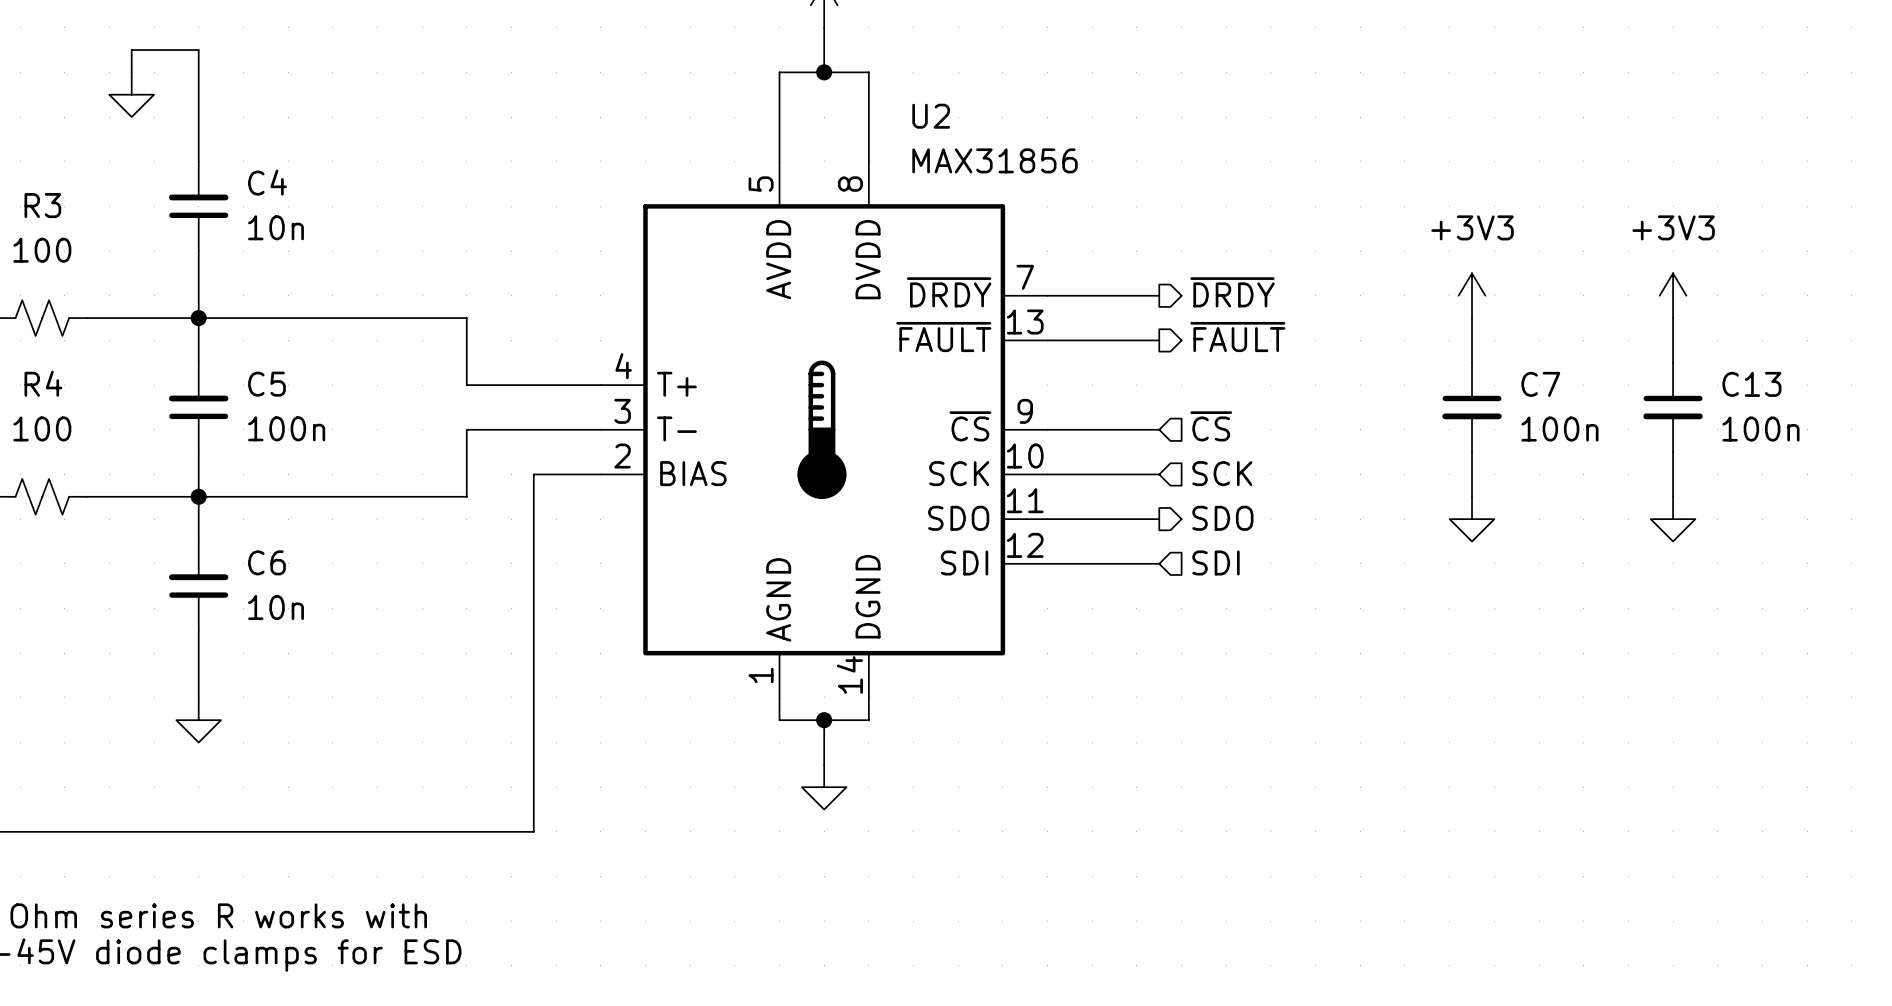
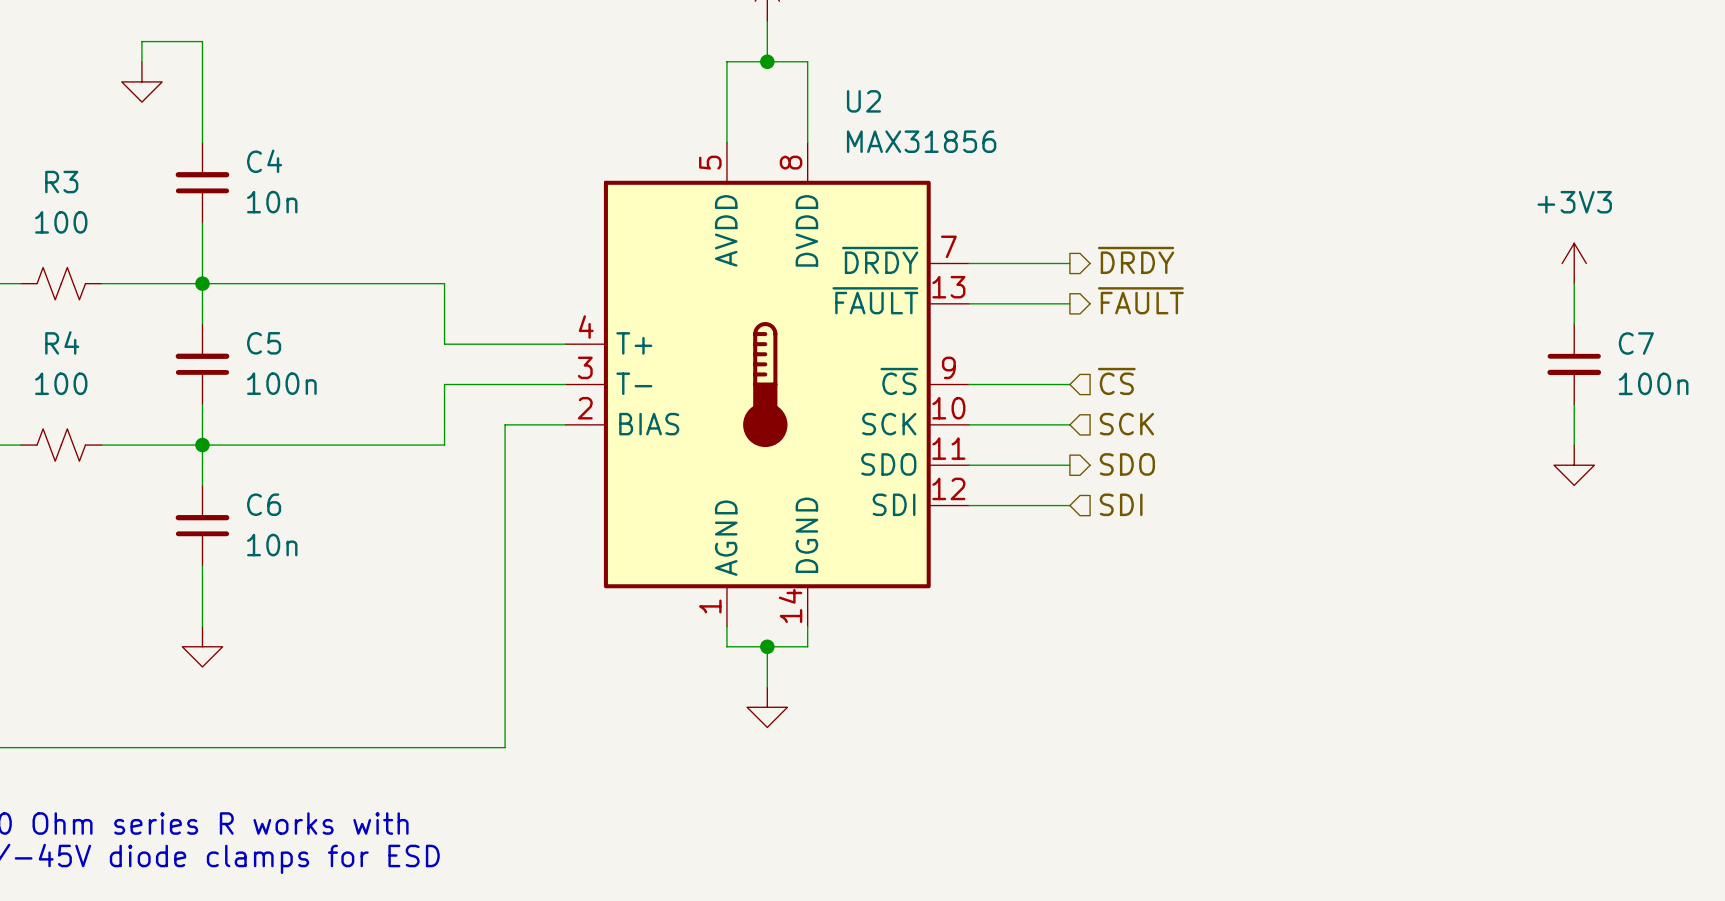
power symbol: +3V3 (1472, 295) -> none
power symbol position: +3V3 (1673, 295) -> +3V3 (1574, 263)
wire: (1472, 318) (1472, 362) -> none
wire: (1673, 318) (1673, 362) -> (1574, 283) (1574, 324)
C7 position: (1472, 407) -> (1574, 364)
C13: 100n (1673, 407) -> none
wire: (1472, 452) (1472, 496) -> none
wire: (1673, 452) (1673, 496) -> (1574, 404) (1574, 445)
power symbol: (1472, 519) -> none
power symbol position: (1673, 519) -> (1574, 465)

